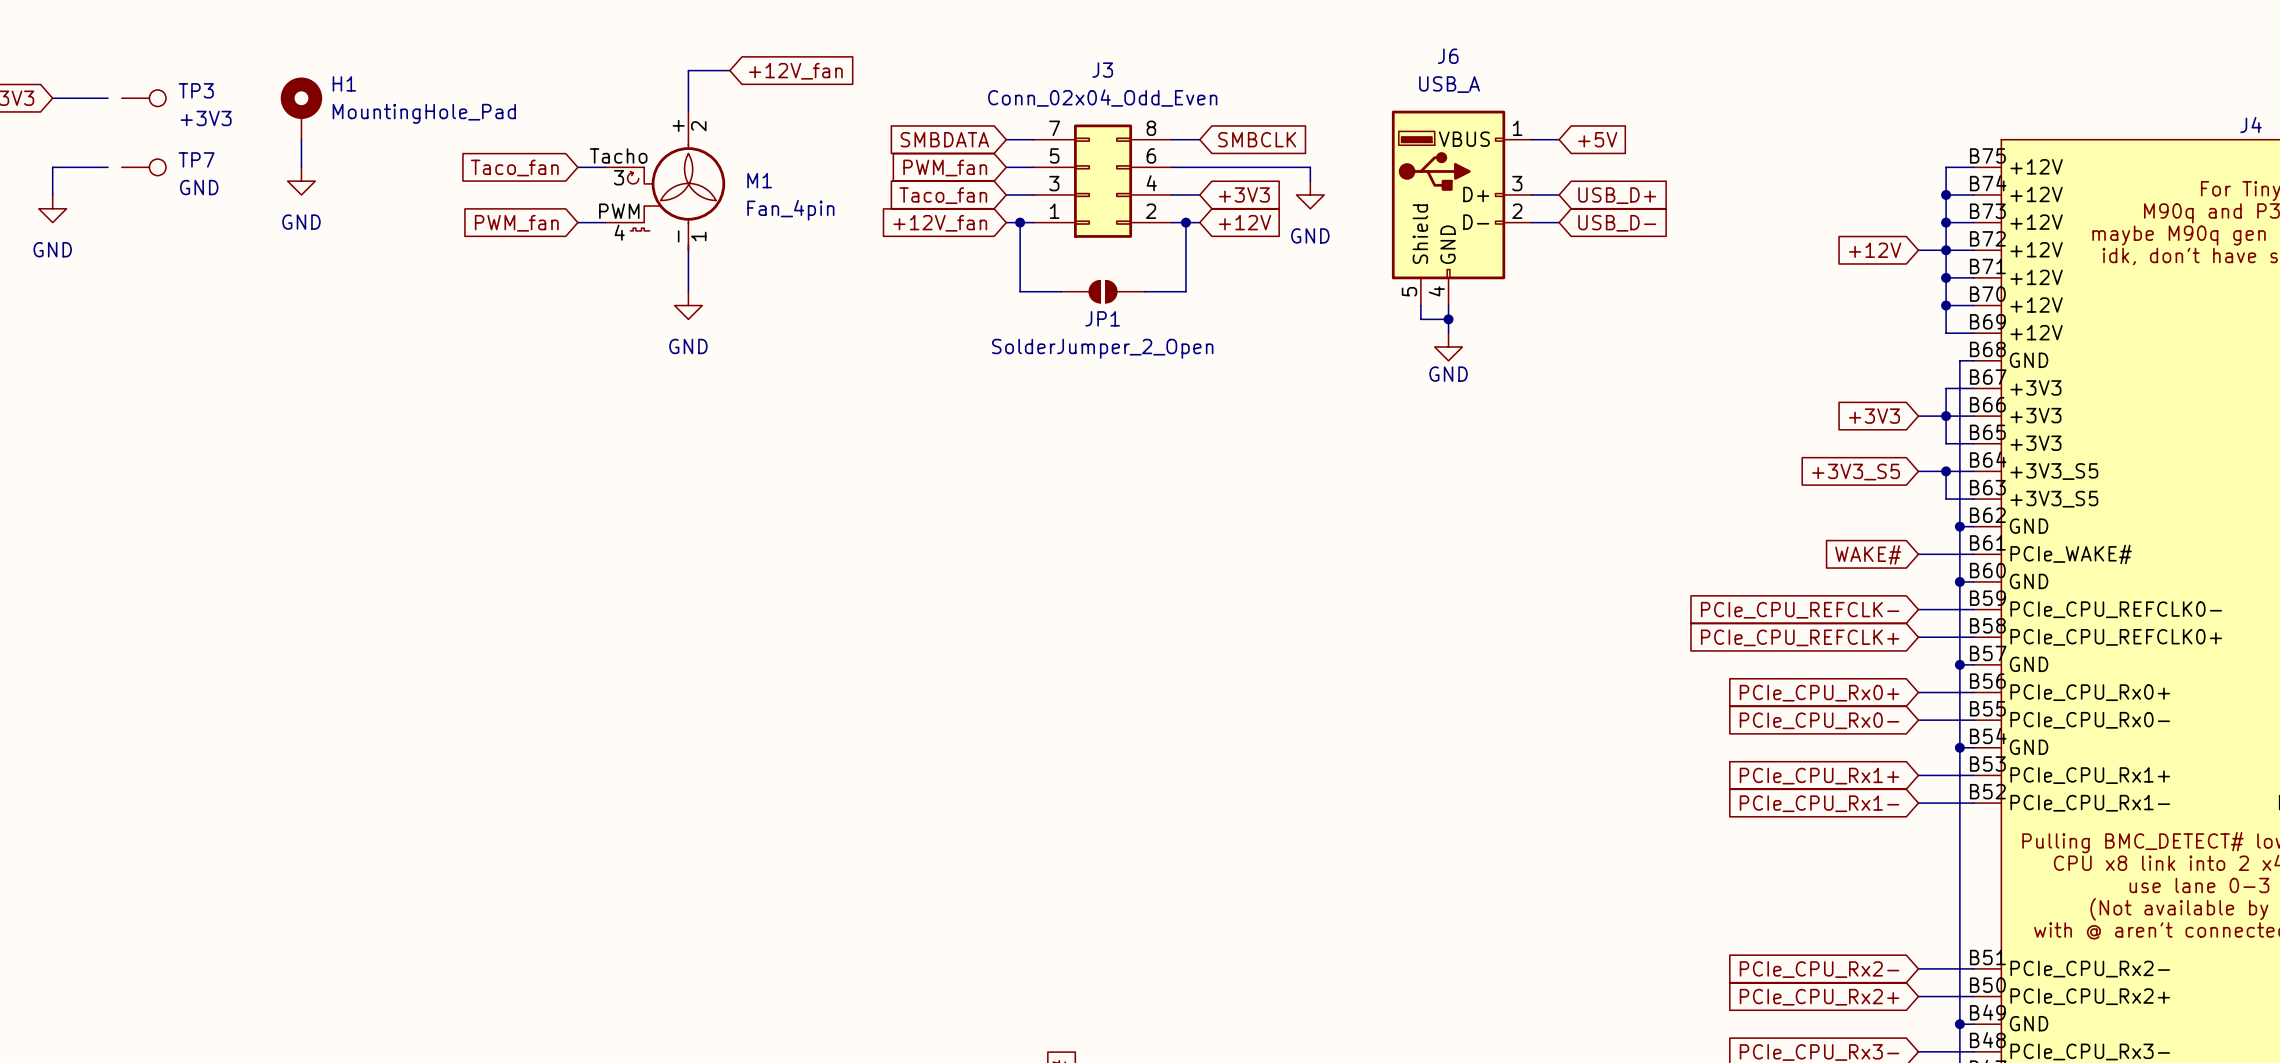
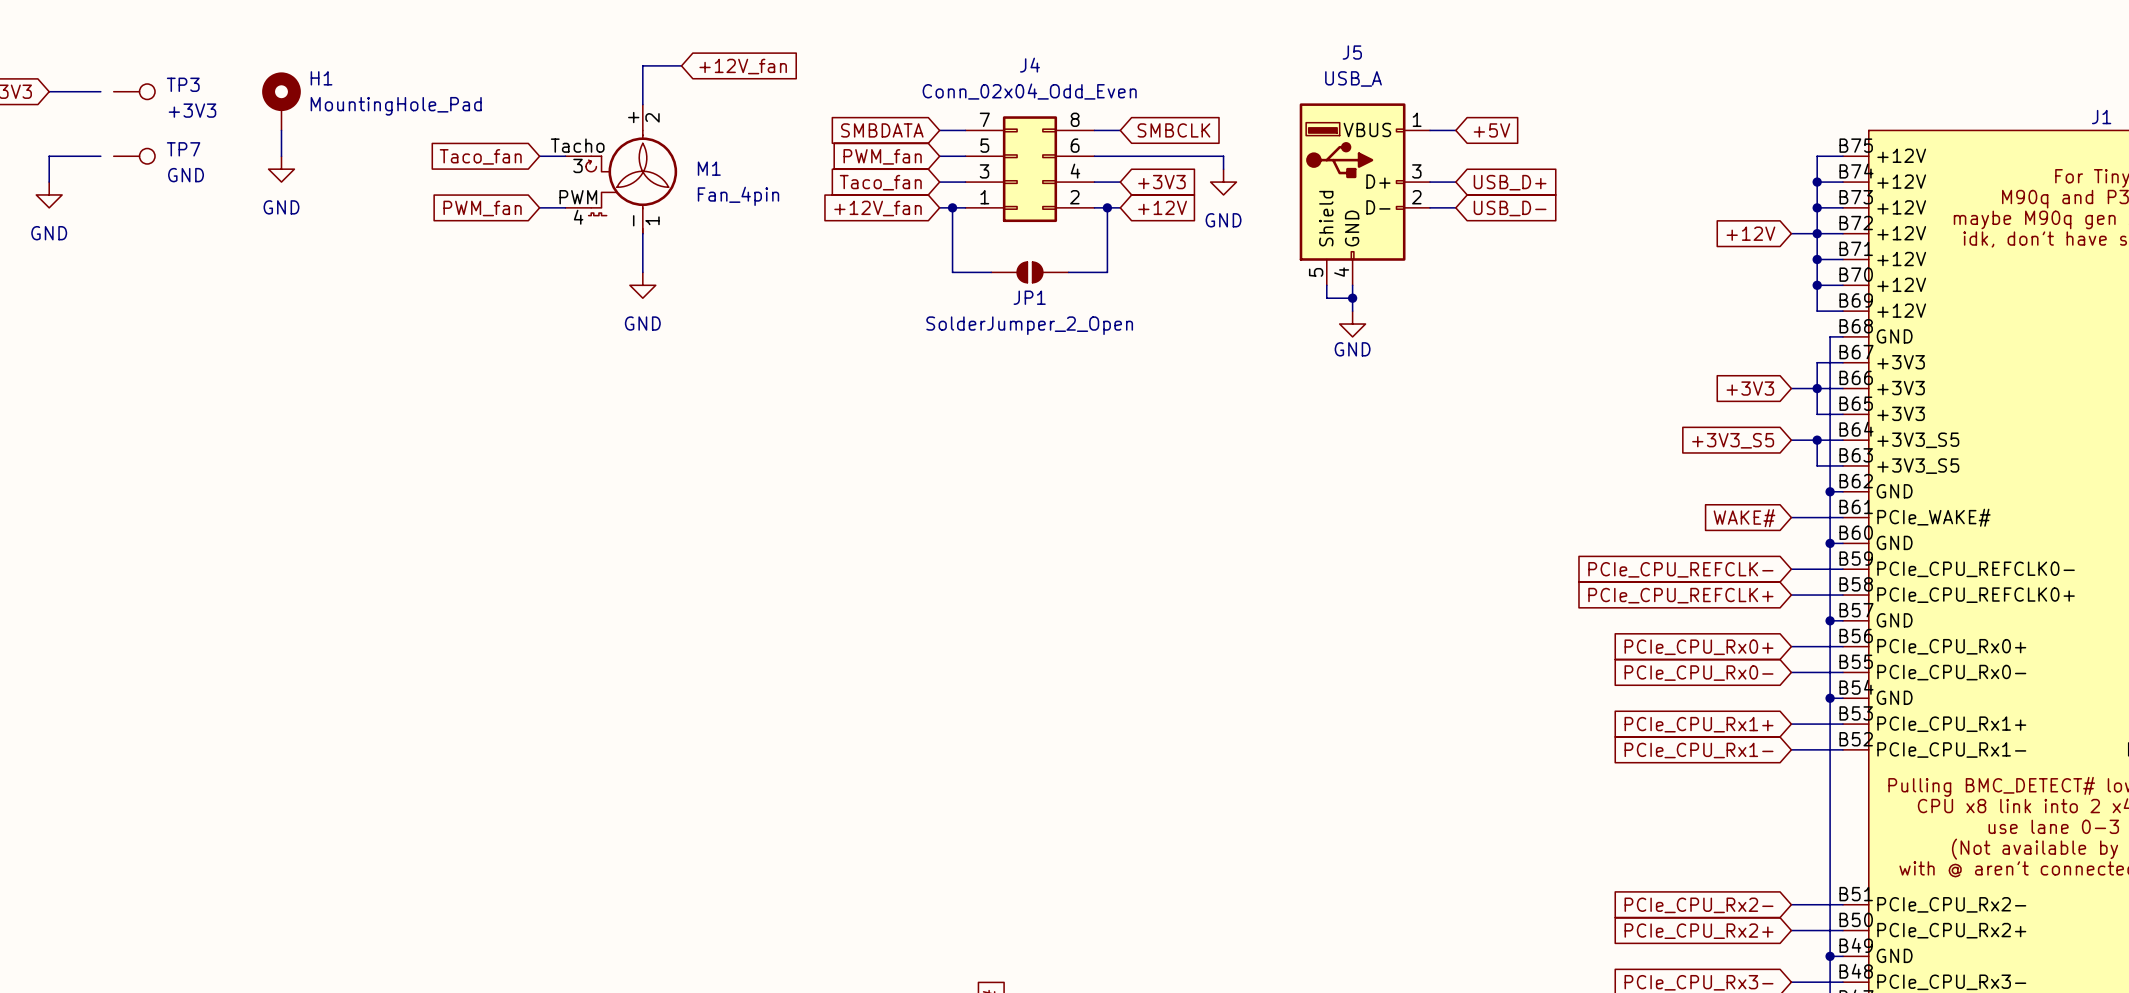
J6 name: J6 (1448, 56) -> J5 (1352, 52)
J3 name: J3 (1102, 70) -> J4 (1029, 65)
J4 name: J4 (2251, 125) -> J1 (2101, 117)

